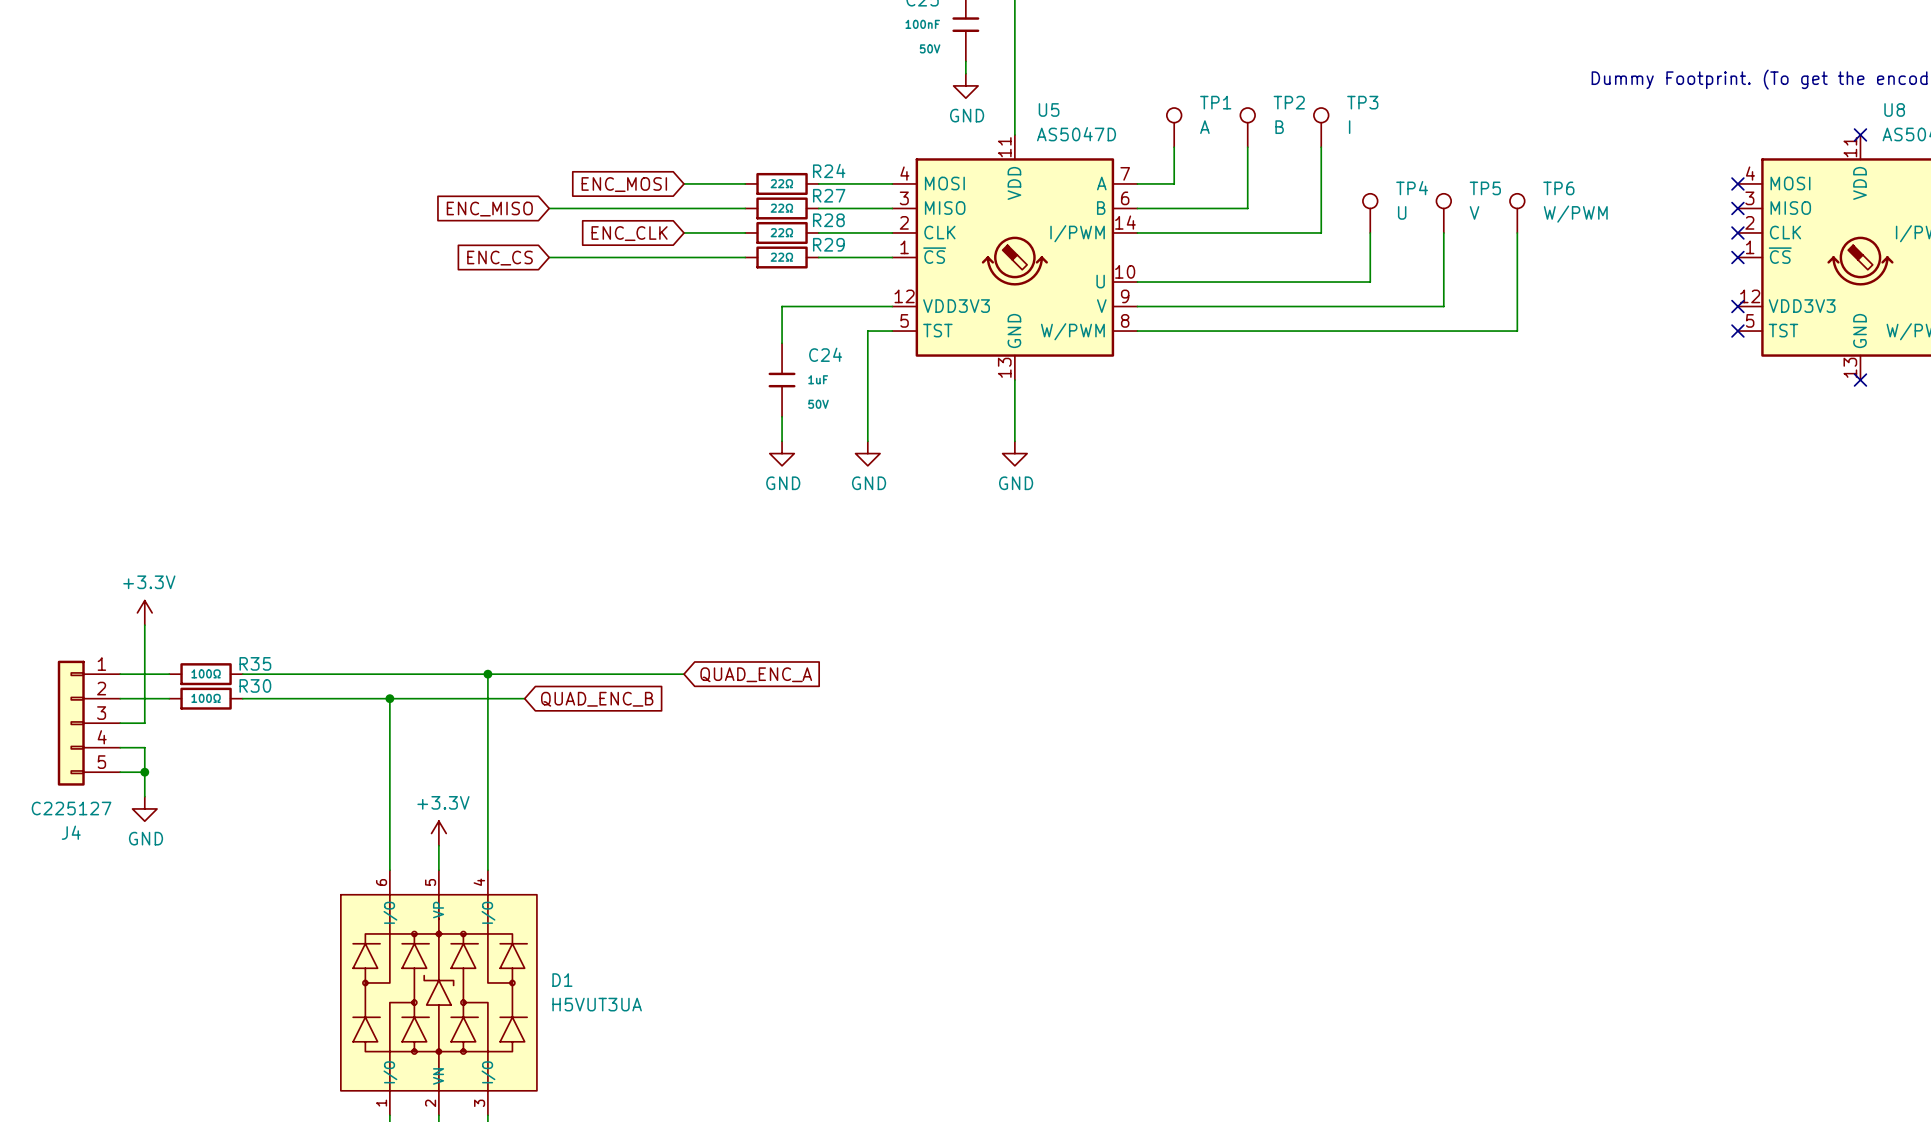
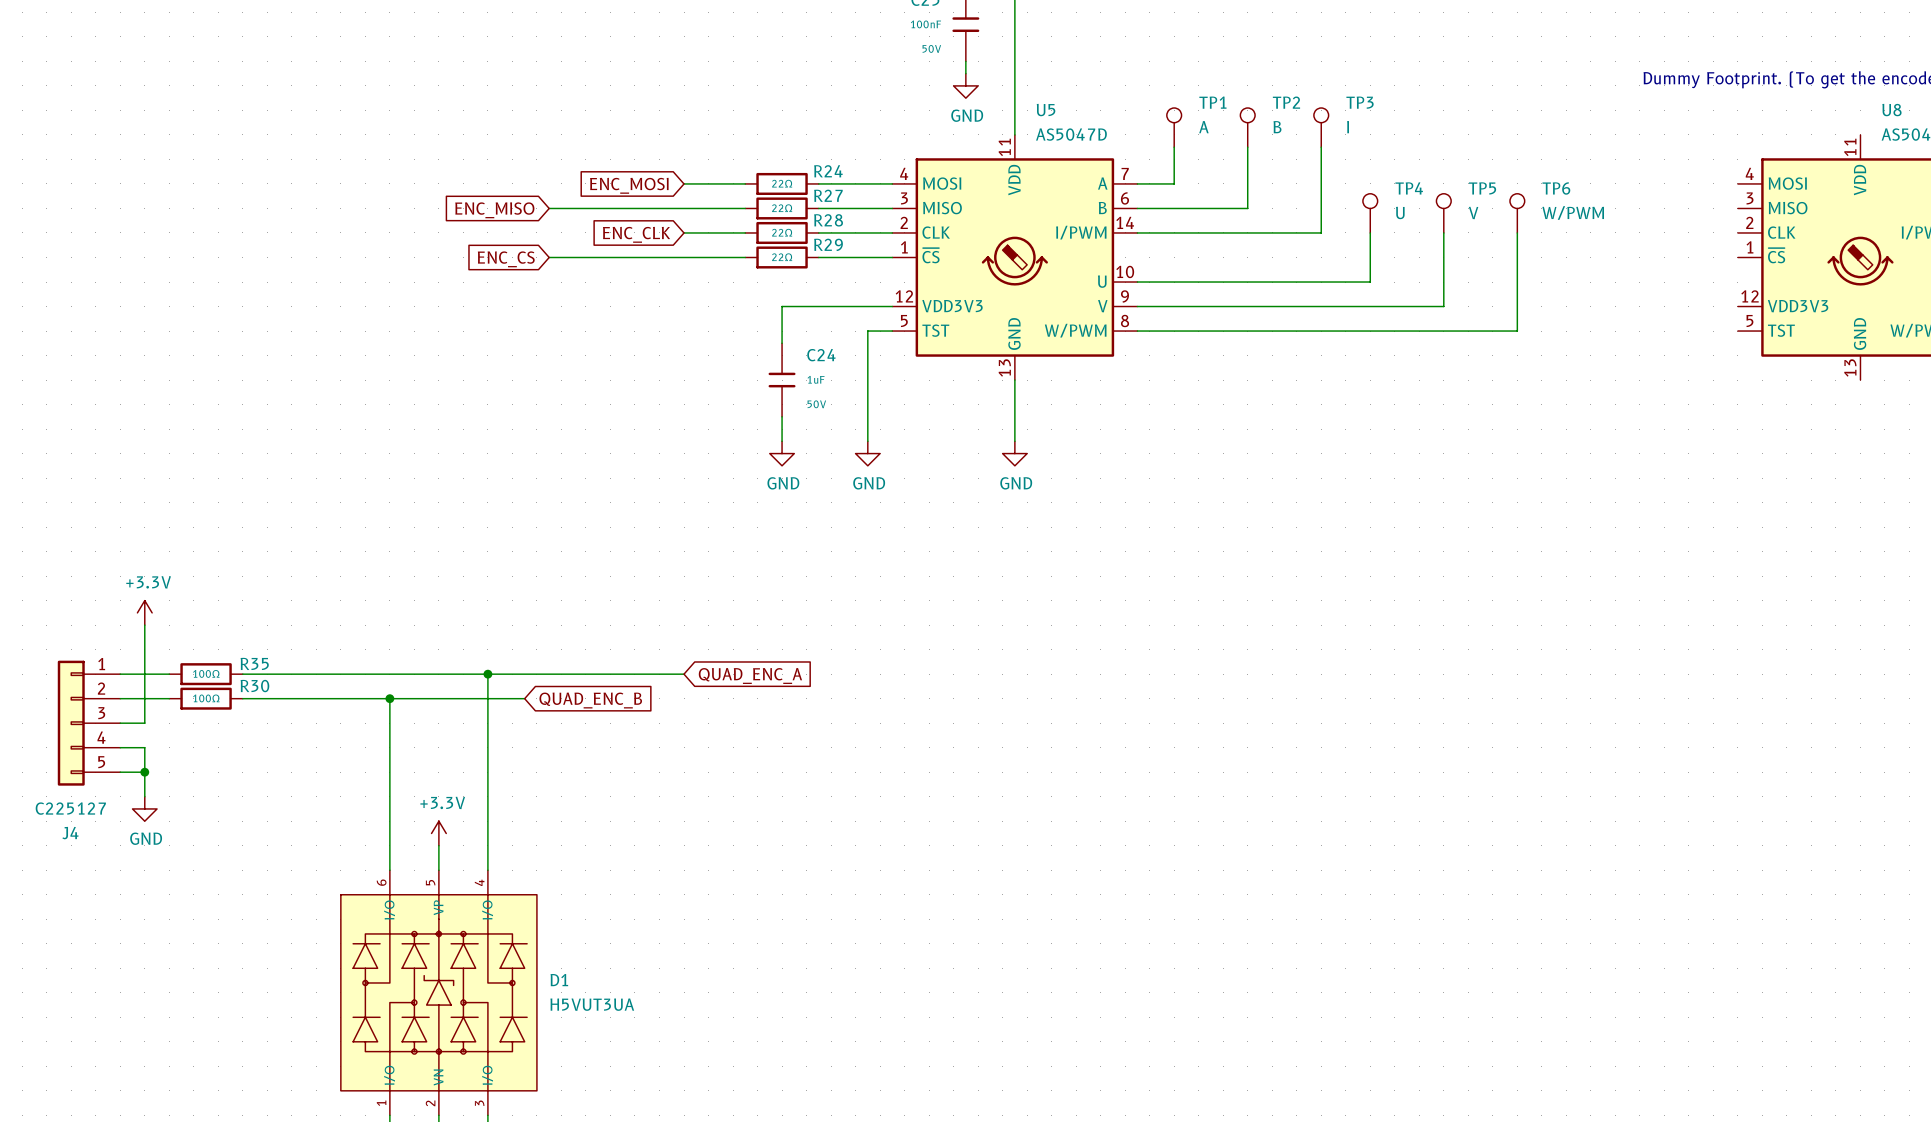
no-connect mark: (1860, 134) -> none
no-connect mark: (1737, 183) -> none
no-connect mark: (1737, 208) -> none
no-connect mark: (1737, 232) -> none
no-connect mark: (1737, 257) -> none
no-connect mark: (1737, 306) -> none
no-connect mark: (1737, 331) -> none
no-connect mark: (1860, 380) -> none

